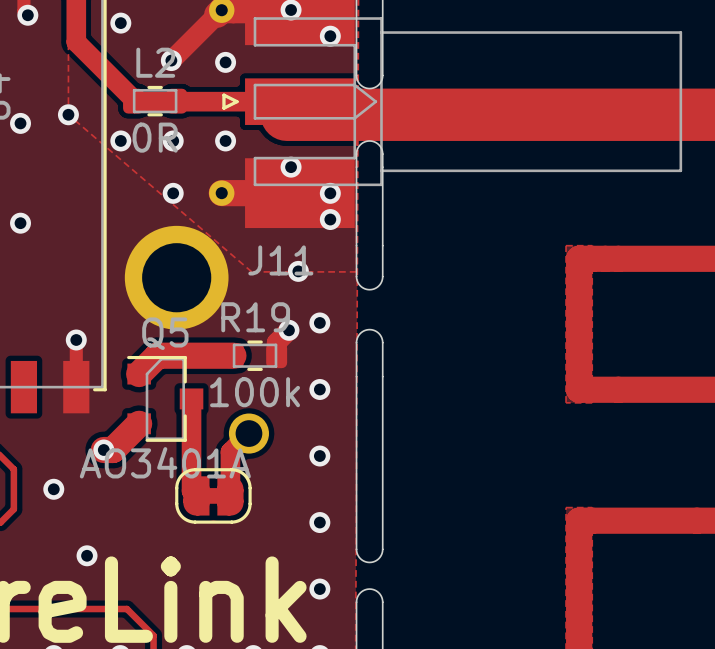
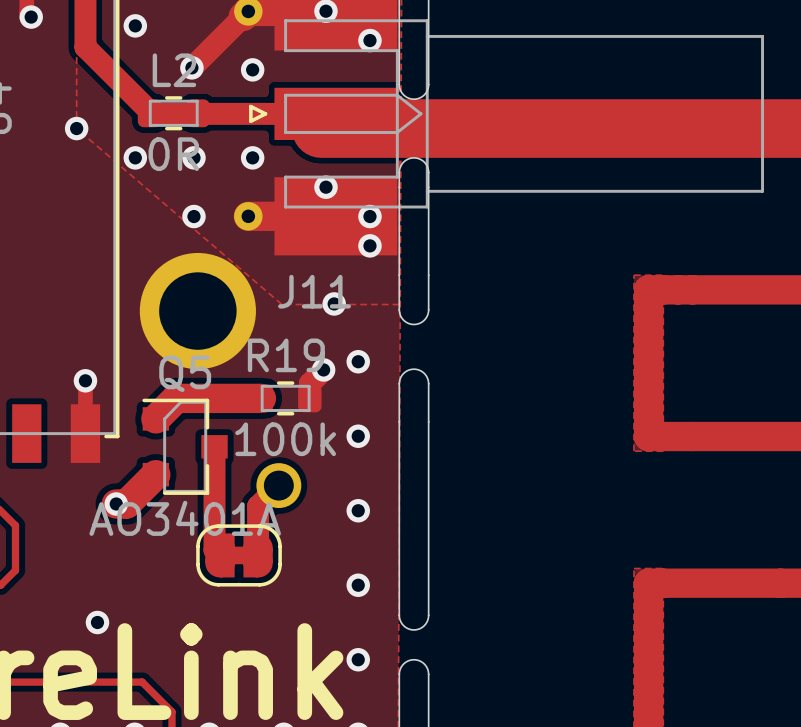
via: (20, 123) -> none
via: (20, 223) -> none
via: (53, 489) -> none

